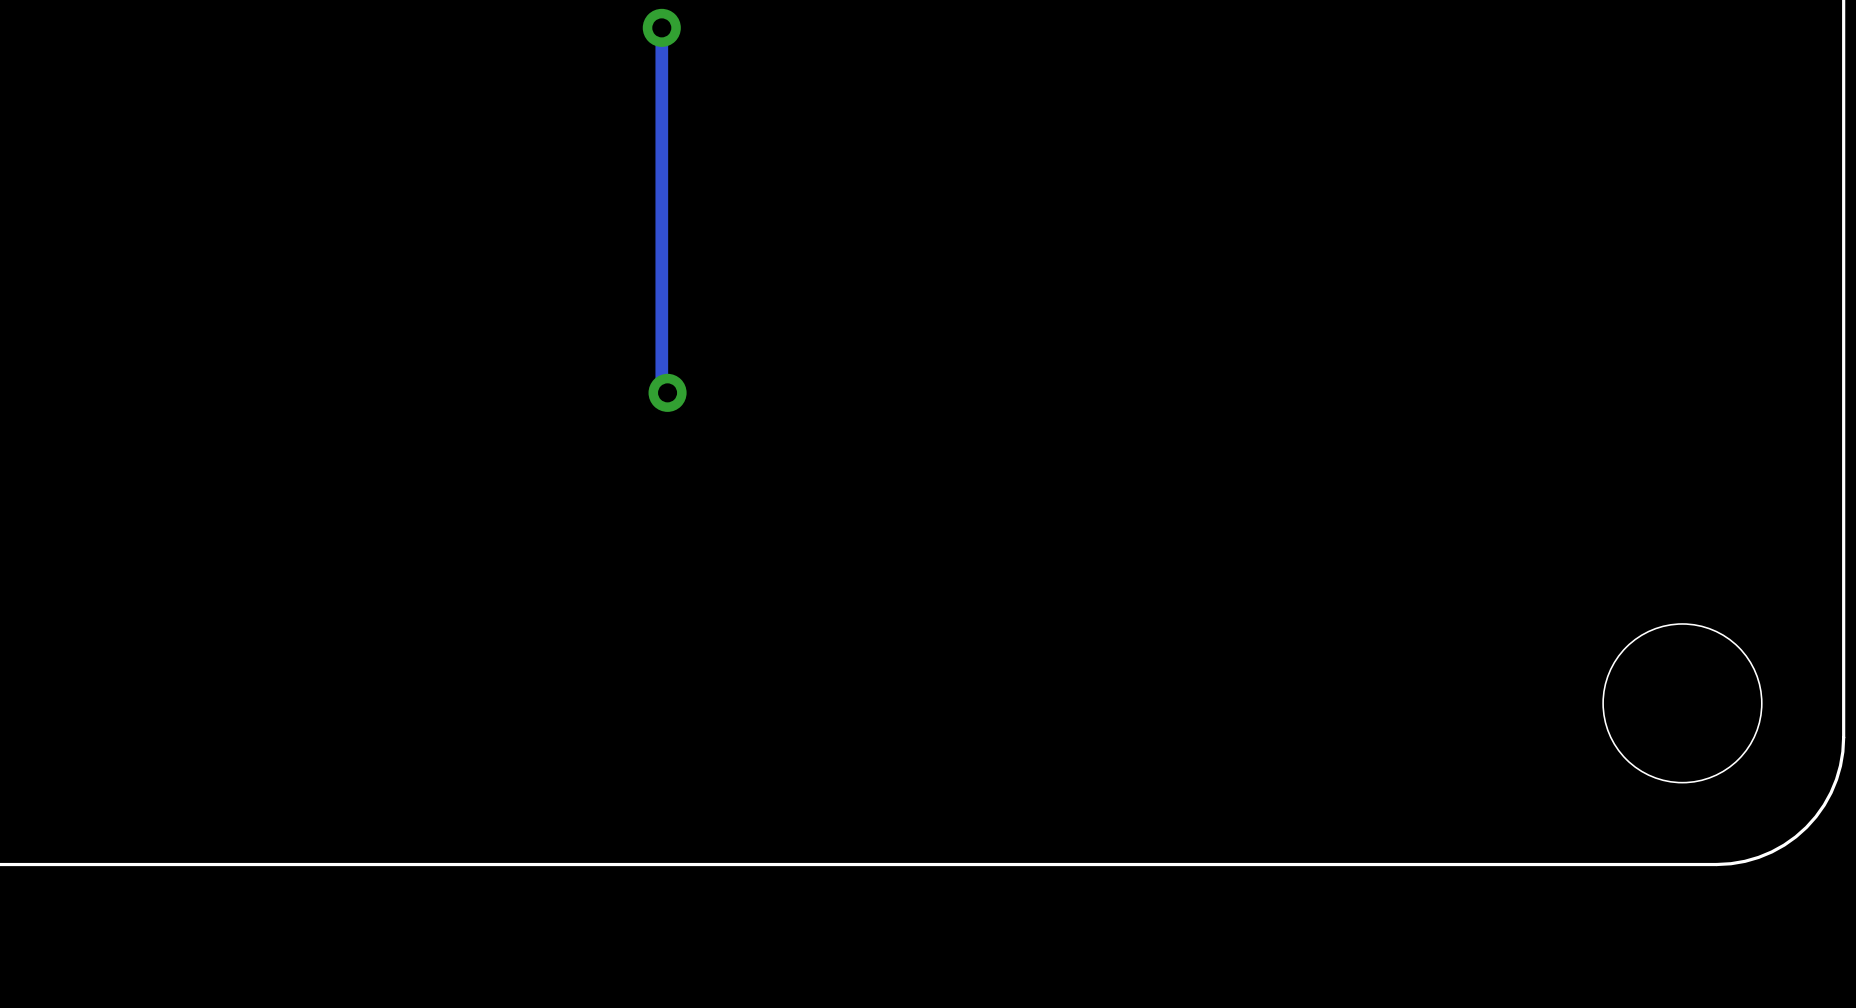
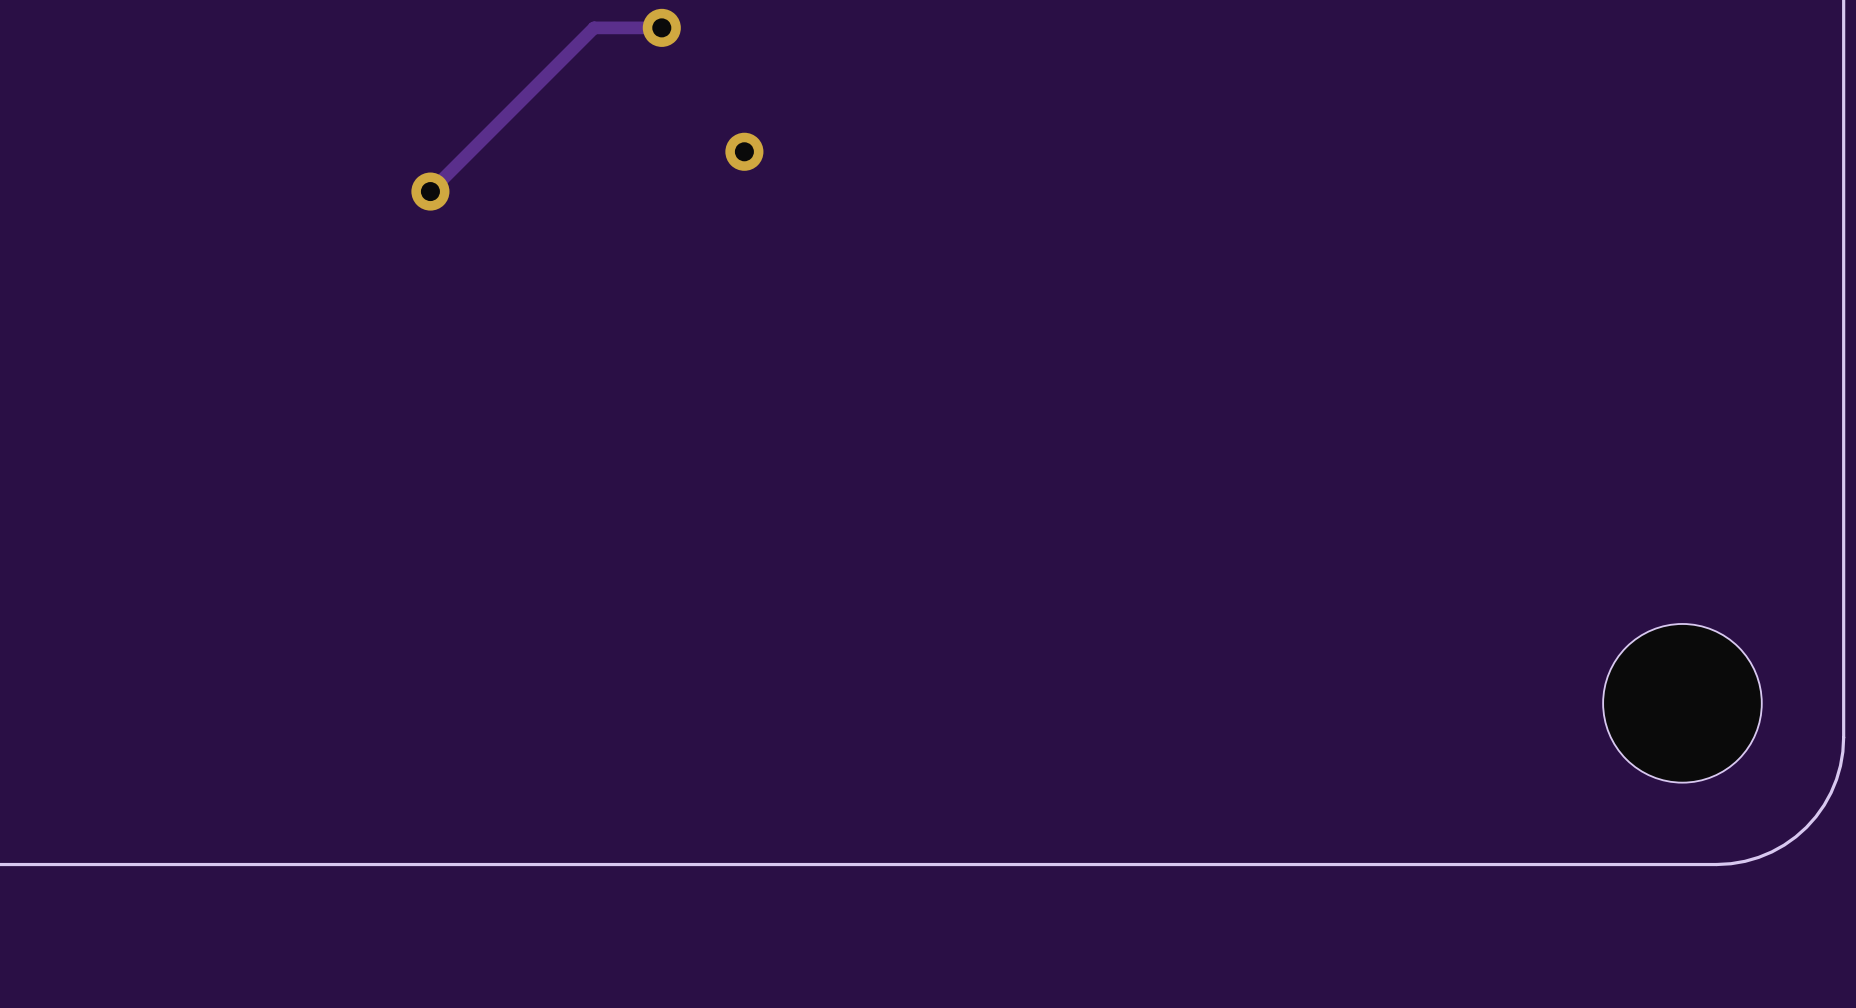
track: (661, 27) (661, 387) (667, 392) -> (661, 27) (594, 27) (430, 191)
via: none -> (744, 151)
via: none -> (430, 191)
via: (667, 392) -> none

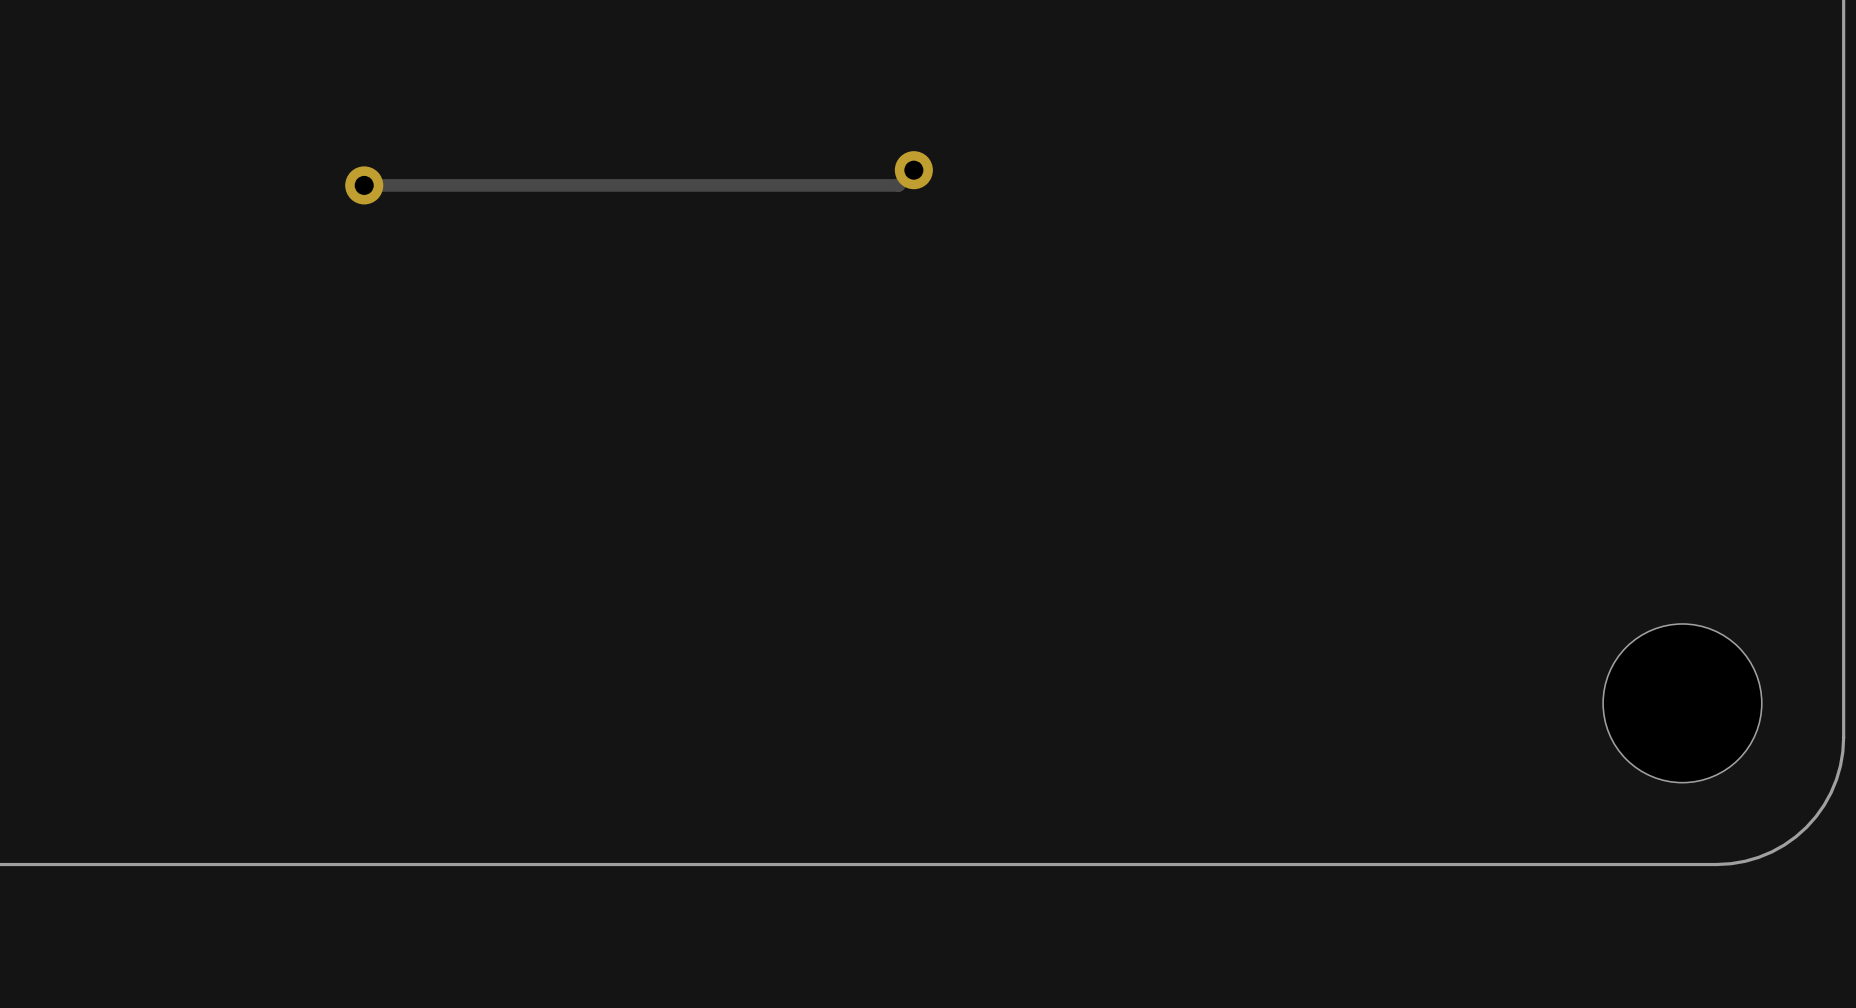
track: (661, 27) (594, 27) (430, 191) -> none
via: (661, 27) -> none
via: (744, 151) -> none
track: none -> (913, 170) (898, 185) (364, 185)
via: none -> (913, 170)
via position: (430, 191) -> (364, 185)

